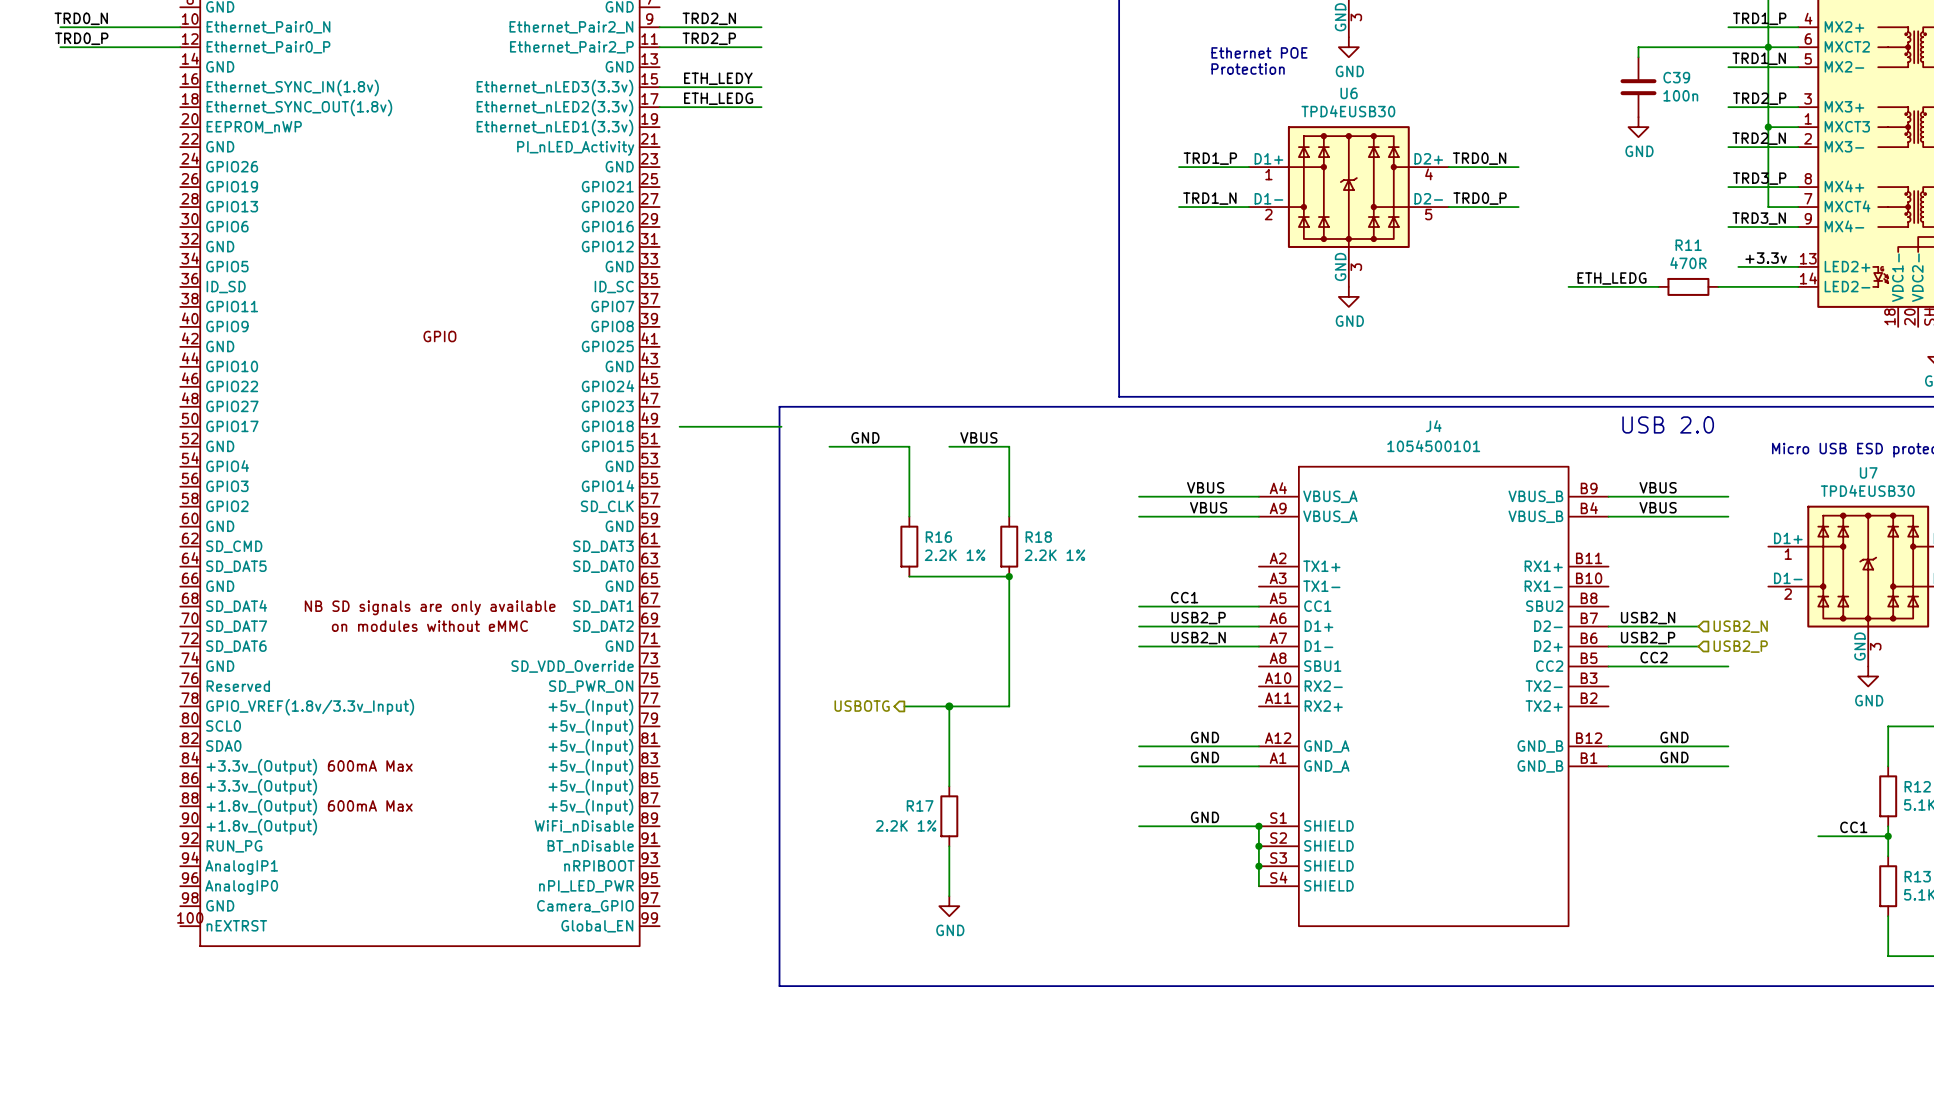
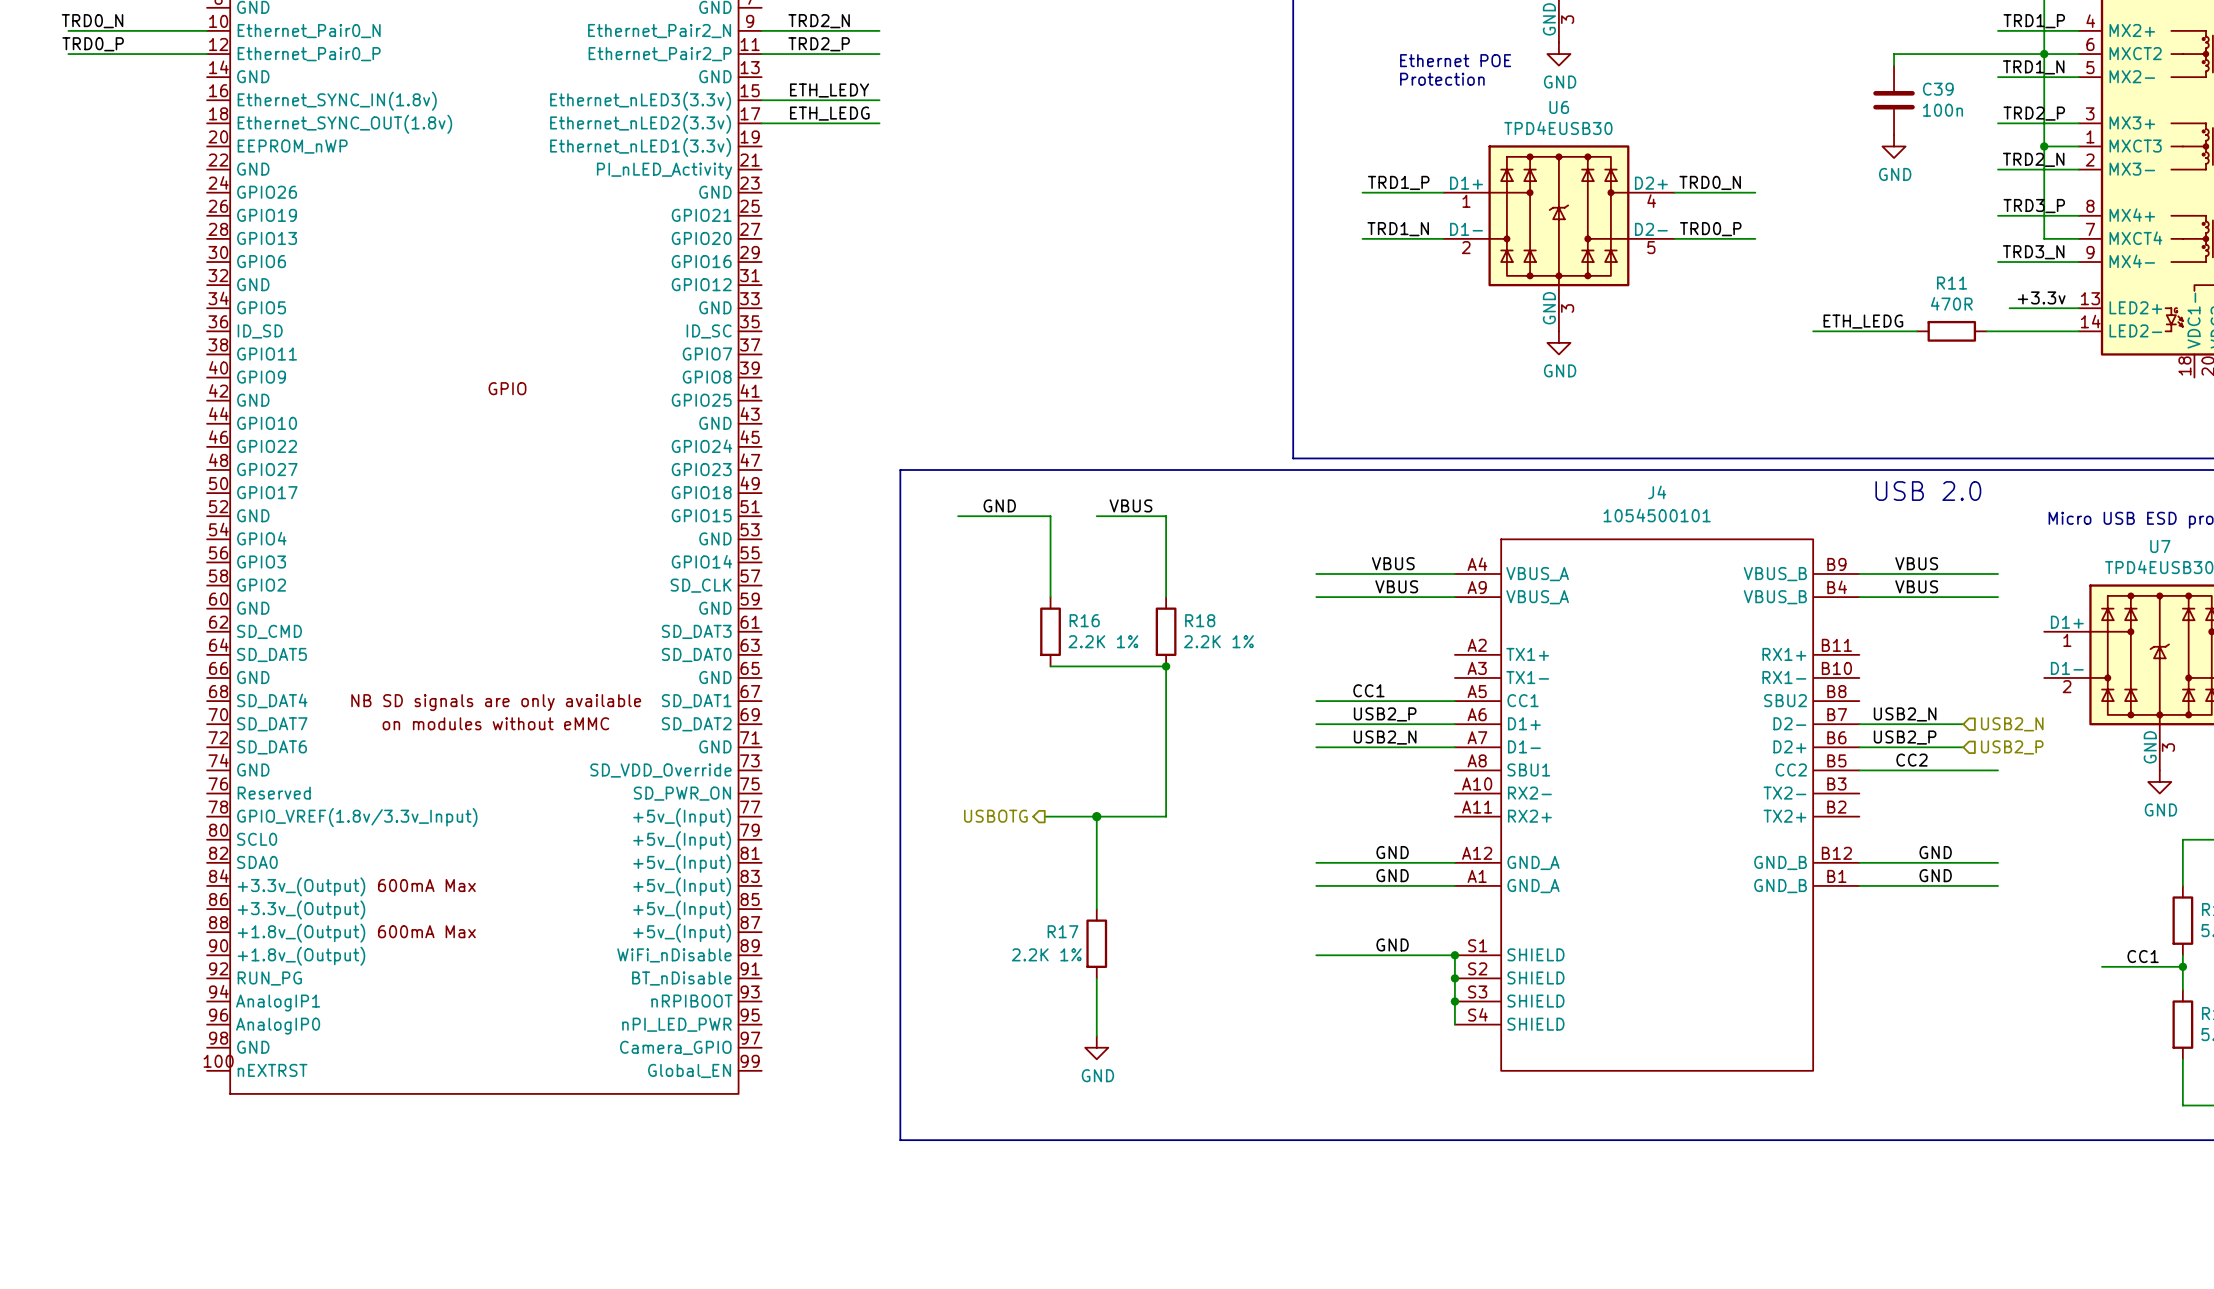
wire: (679, 426) (781, 426) -> none

